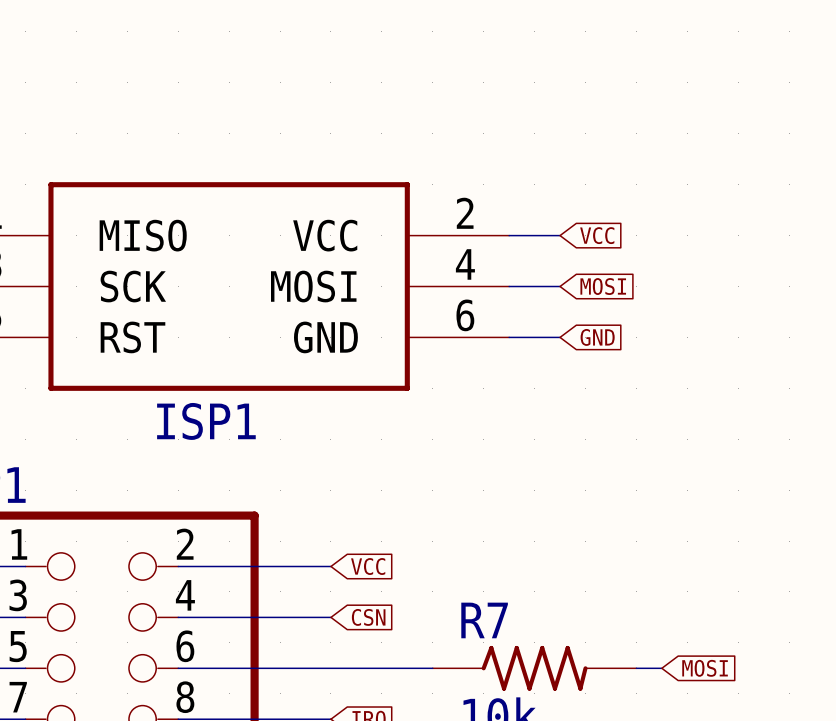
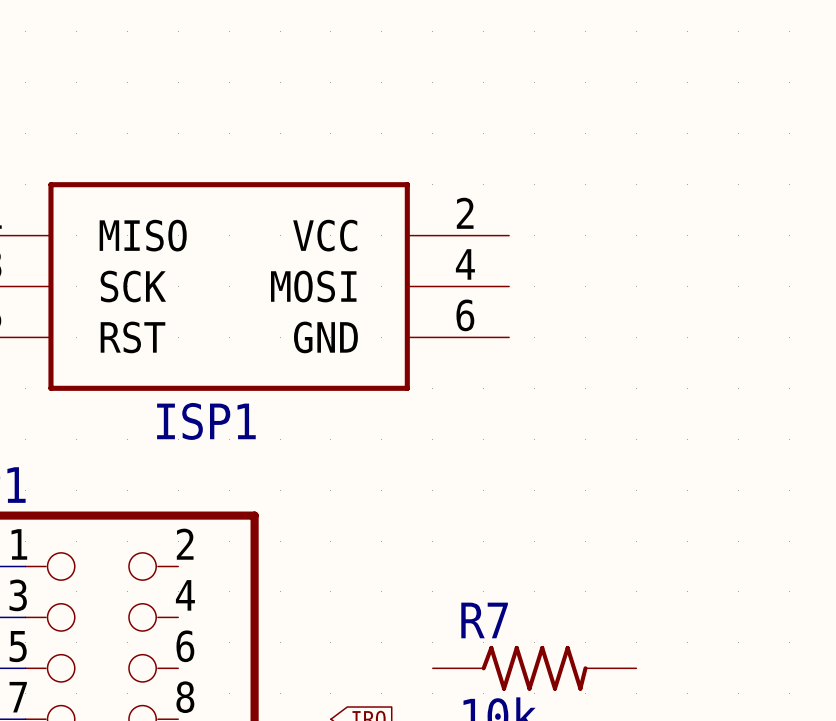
wire: (509, 235) (560, 235) -> none
global label: VCC (597, 235) -> none
wire: (509, 286) (560, 286) -> none
global label: MOSI (603, 286) -> none
wire: (509, 337) (560, 337) -> none
global label: GND (597, 337) -> none
wire: (178, 566) (330, 566) -> none
global label: VCC (368, 566) -> none
wire: (178, 617) (330, 617) -> none
global label: CSN (368, 617) -> none
wire: (178, 668) (432, 668) -> none
wire: (636, 668) (661, 668) -> none
global label: MOSI (705, 668) -> none
wire: (178, 719) (330, 719) -> none

